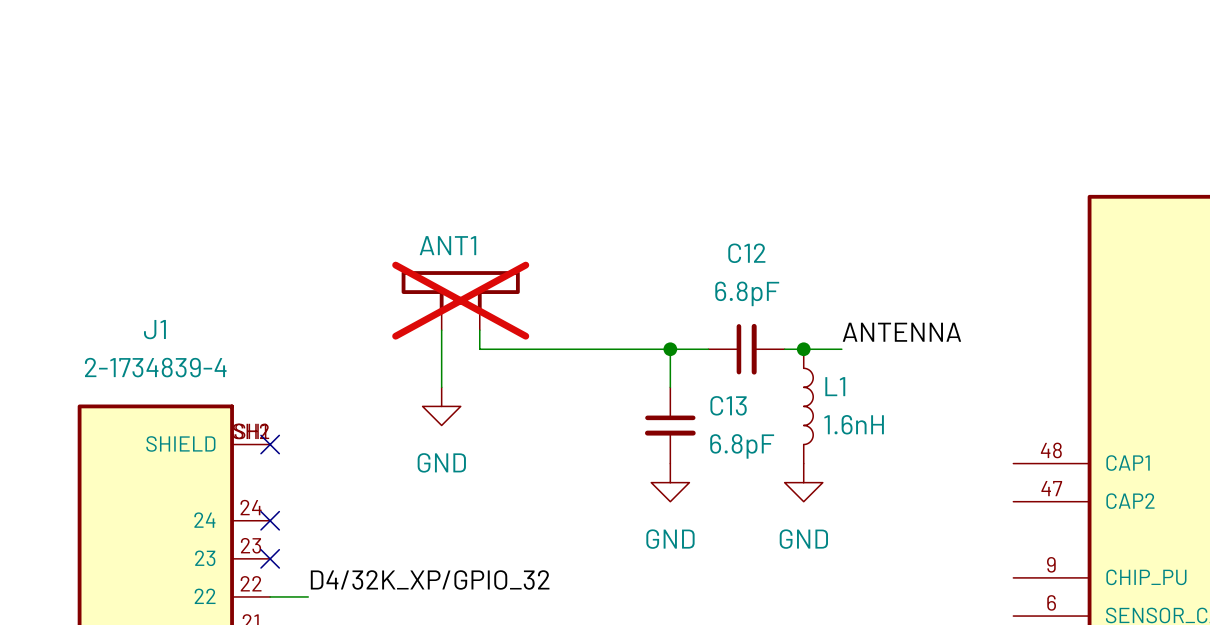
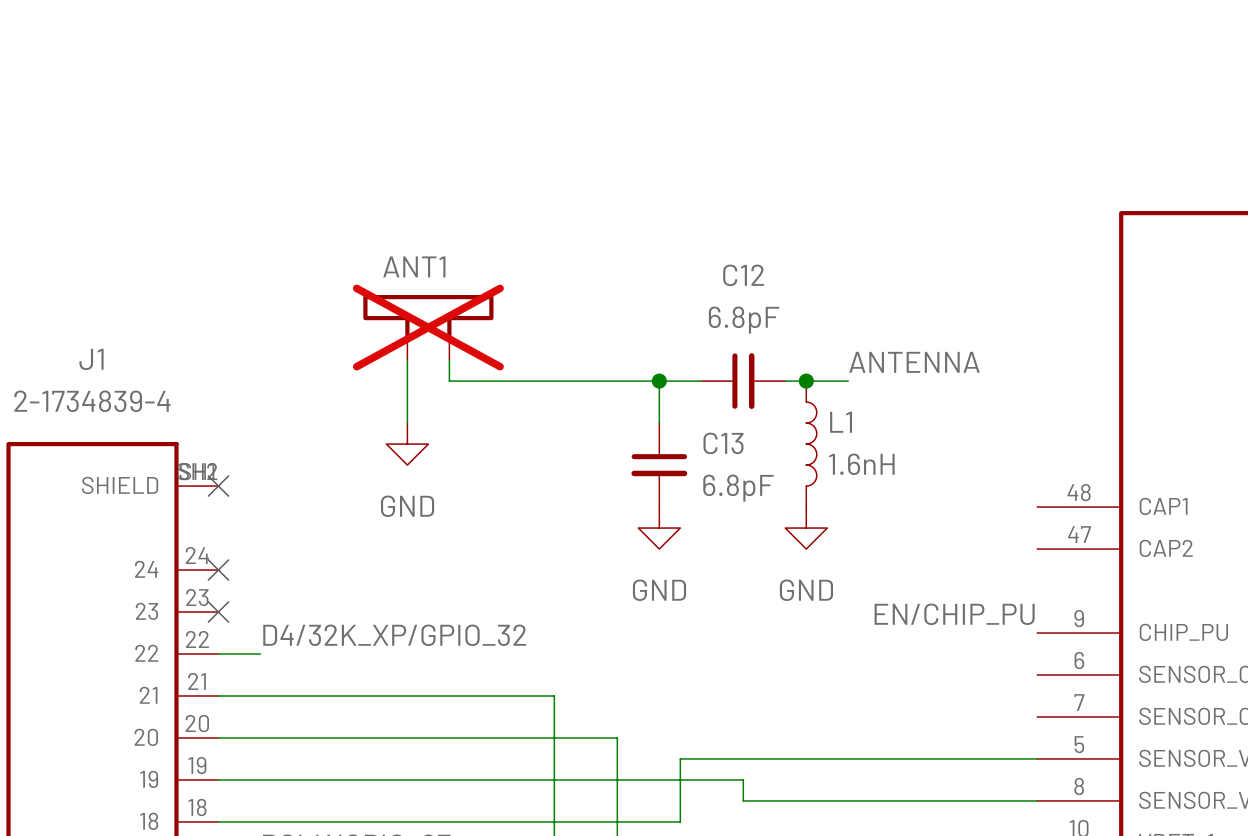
label: none -> EN/CHIP_PU (954, 614)

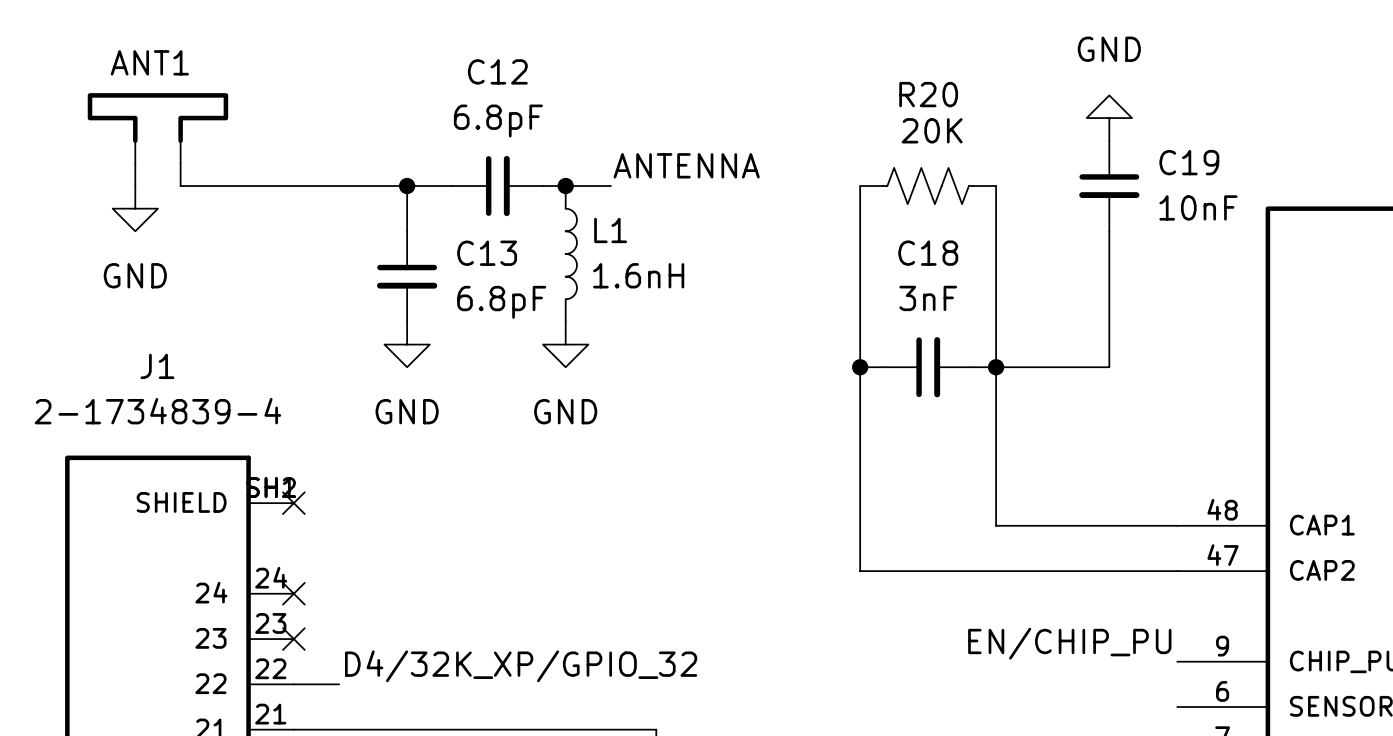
power symbol: none -> GND (1109, 118)
wire: none -> (135, 163) (135, 186)
junction: none -> (407, 186)
junction: none -> (565, 186)
wire: none -> (860, 186) (860, 571) (1177, 571)
R20: none -> 20K (928, 186)
wire: none -> (996, 186) (996, 525) (1177, 525)
C19: none -> 10nF (1109, 186)
power symbol: none -> GND (135, 208)
wire: none -> (1109, 231) (1109, 367) (973, 367)
ANT1 position: (428, 327) -> (157, 128)
ANT1 do-not-place cross: (428, 327) -> none
power symbol: none -> GND (407, 344)
power symbol: none -> GND (565, 344)
wire: (407, 360) (407, 423) -> none
wire: (449, 360) (449, 381) (701, 381) -> (180, 163) (180, 186) (452, 186)
wire: none -> (860, 367) (882, 367)
junction: none -> (860, 367)
C18: none -> 3nF (928, 367)
junction: none -> (996, 367)
label position: ANTENNA (914, 362) -> ANTENNA (686, 165)
wire: (659, 381) (659, 423) -> (407, 186) (407, 231)
junction: (659, 381) -> none
C12 position: (743, 381) -> (497, 186)
wire: (785, 381) (848, 381) -> (543, 186) (610, 186)
junction: (806, 381) -> none
power symbol: GND (407, 444) -> none
L1 position: (811, 444) -> (571, 253)
C13 position: (659, 465) -> (407, 276)
power symbol: GND (659, 528) -> none
power symbol: GND (806, 528) -> none

